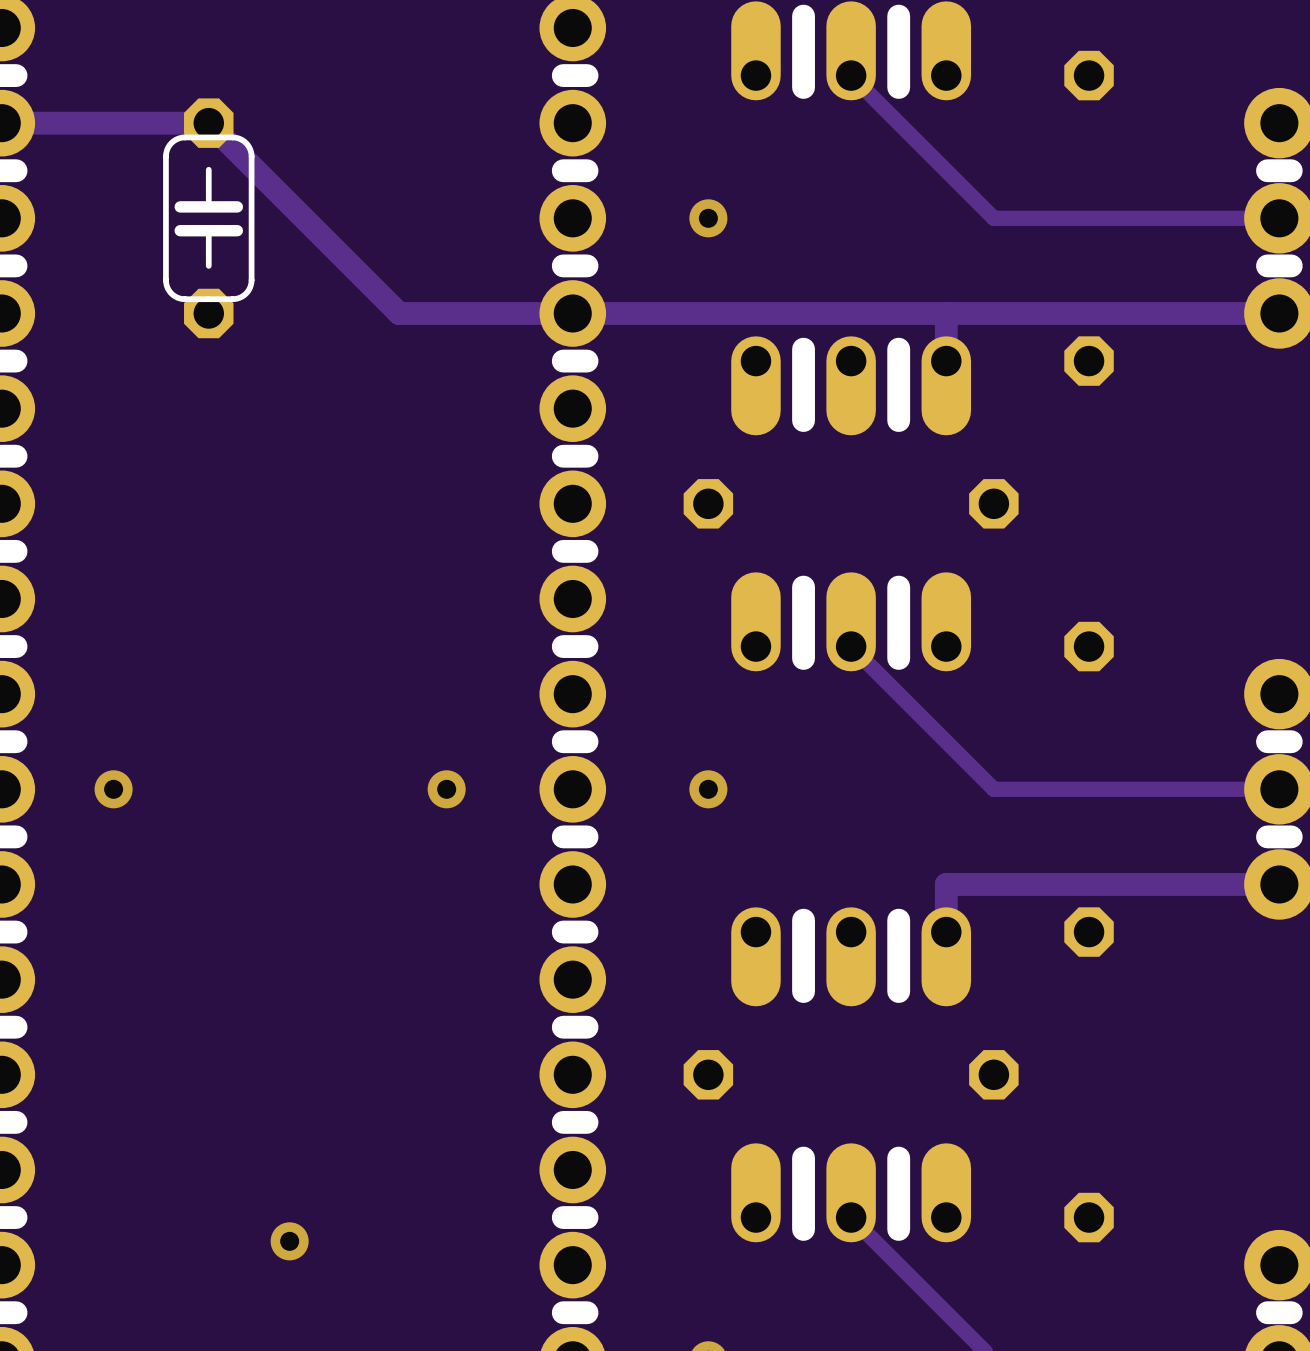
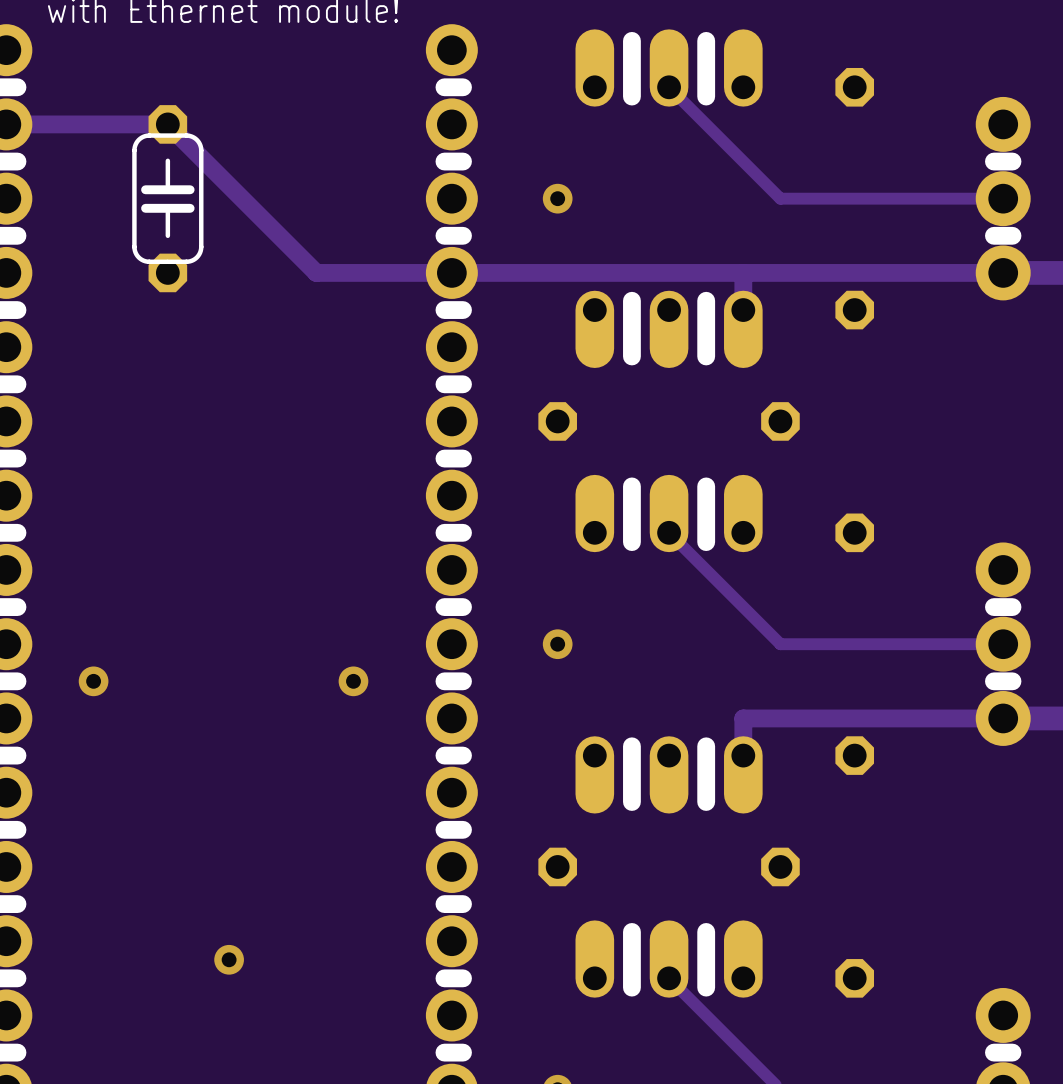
via position: (113, 789) -> (93, 681)
via position: (446, 789) -> (353, 681)
via position: (289, 1241) -> (229, 959)

